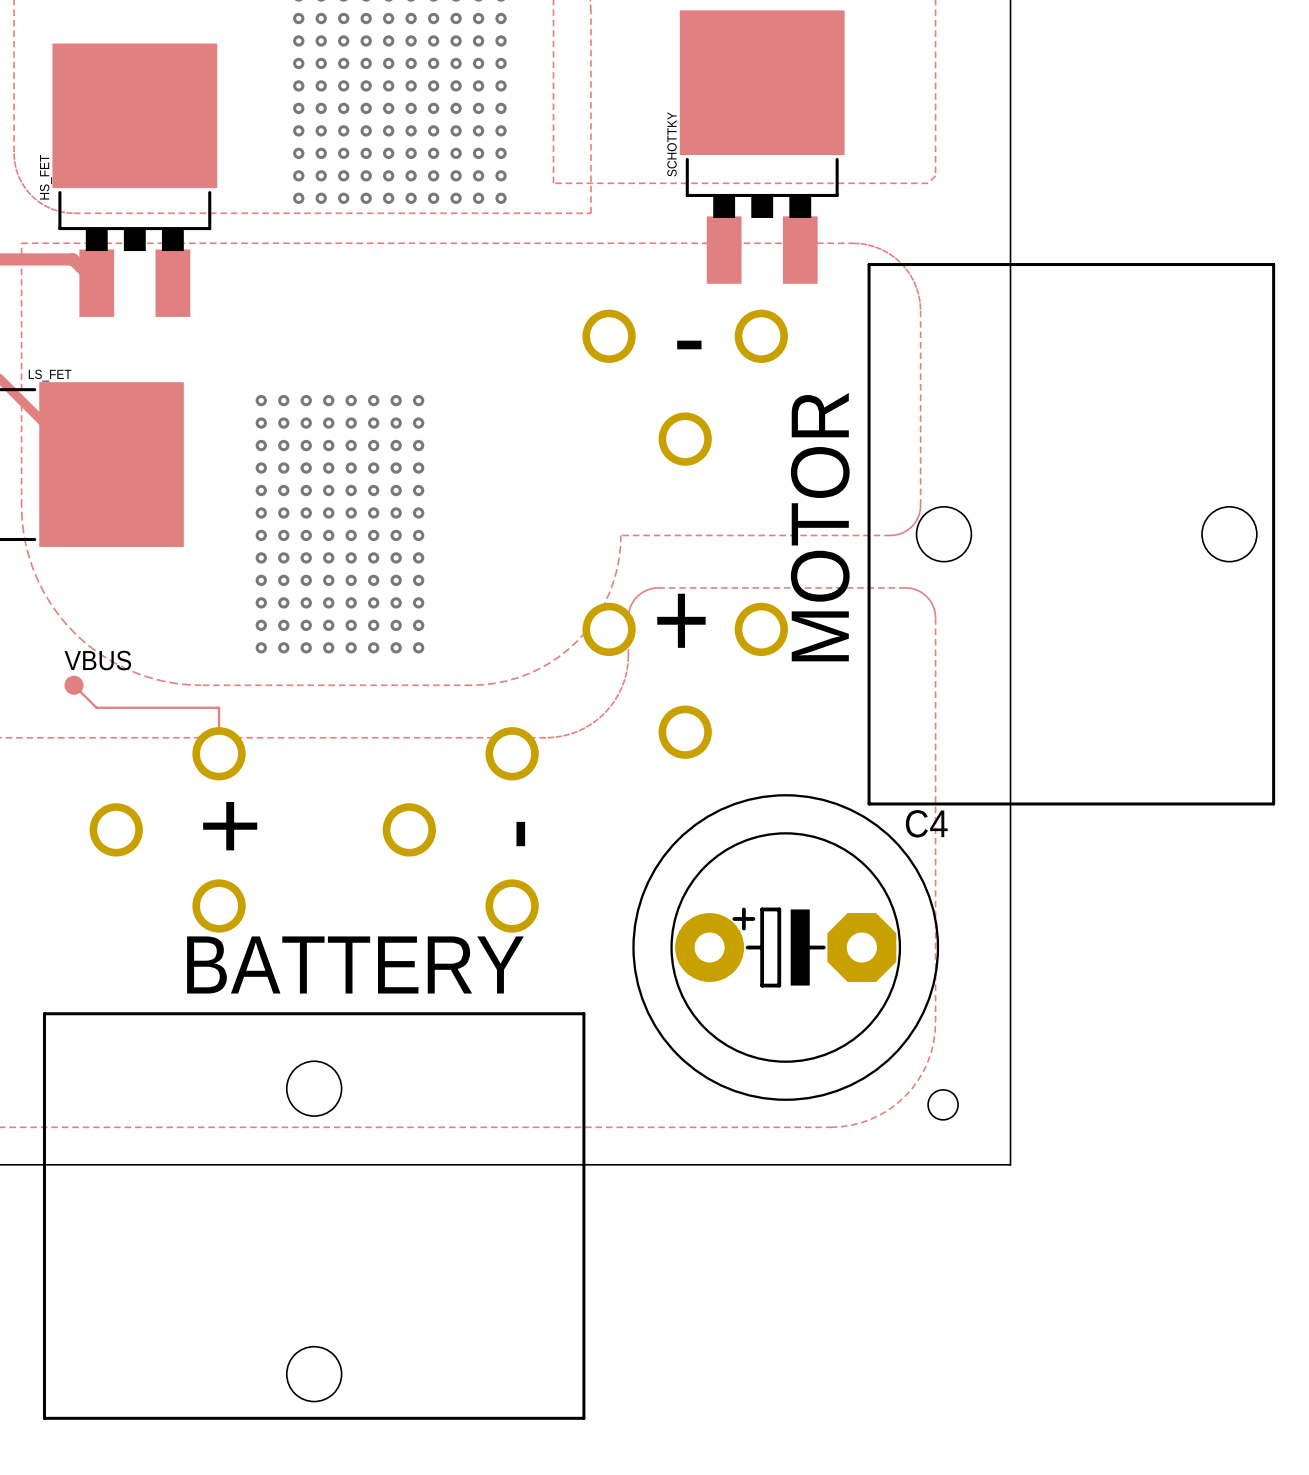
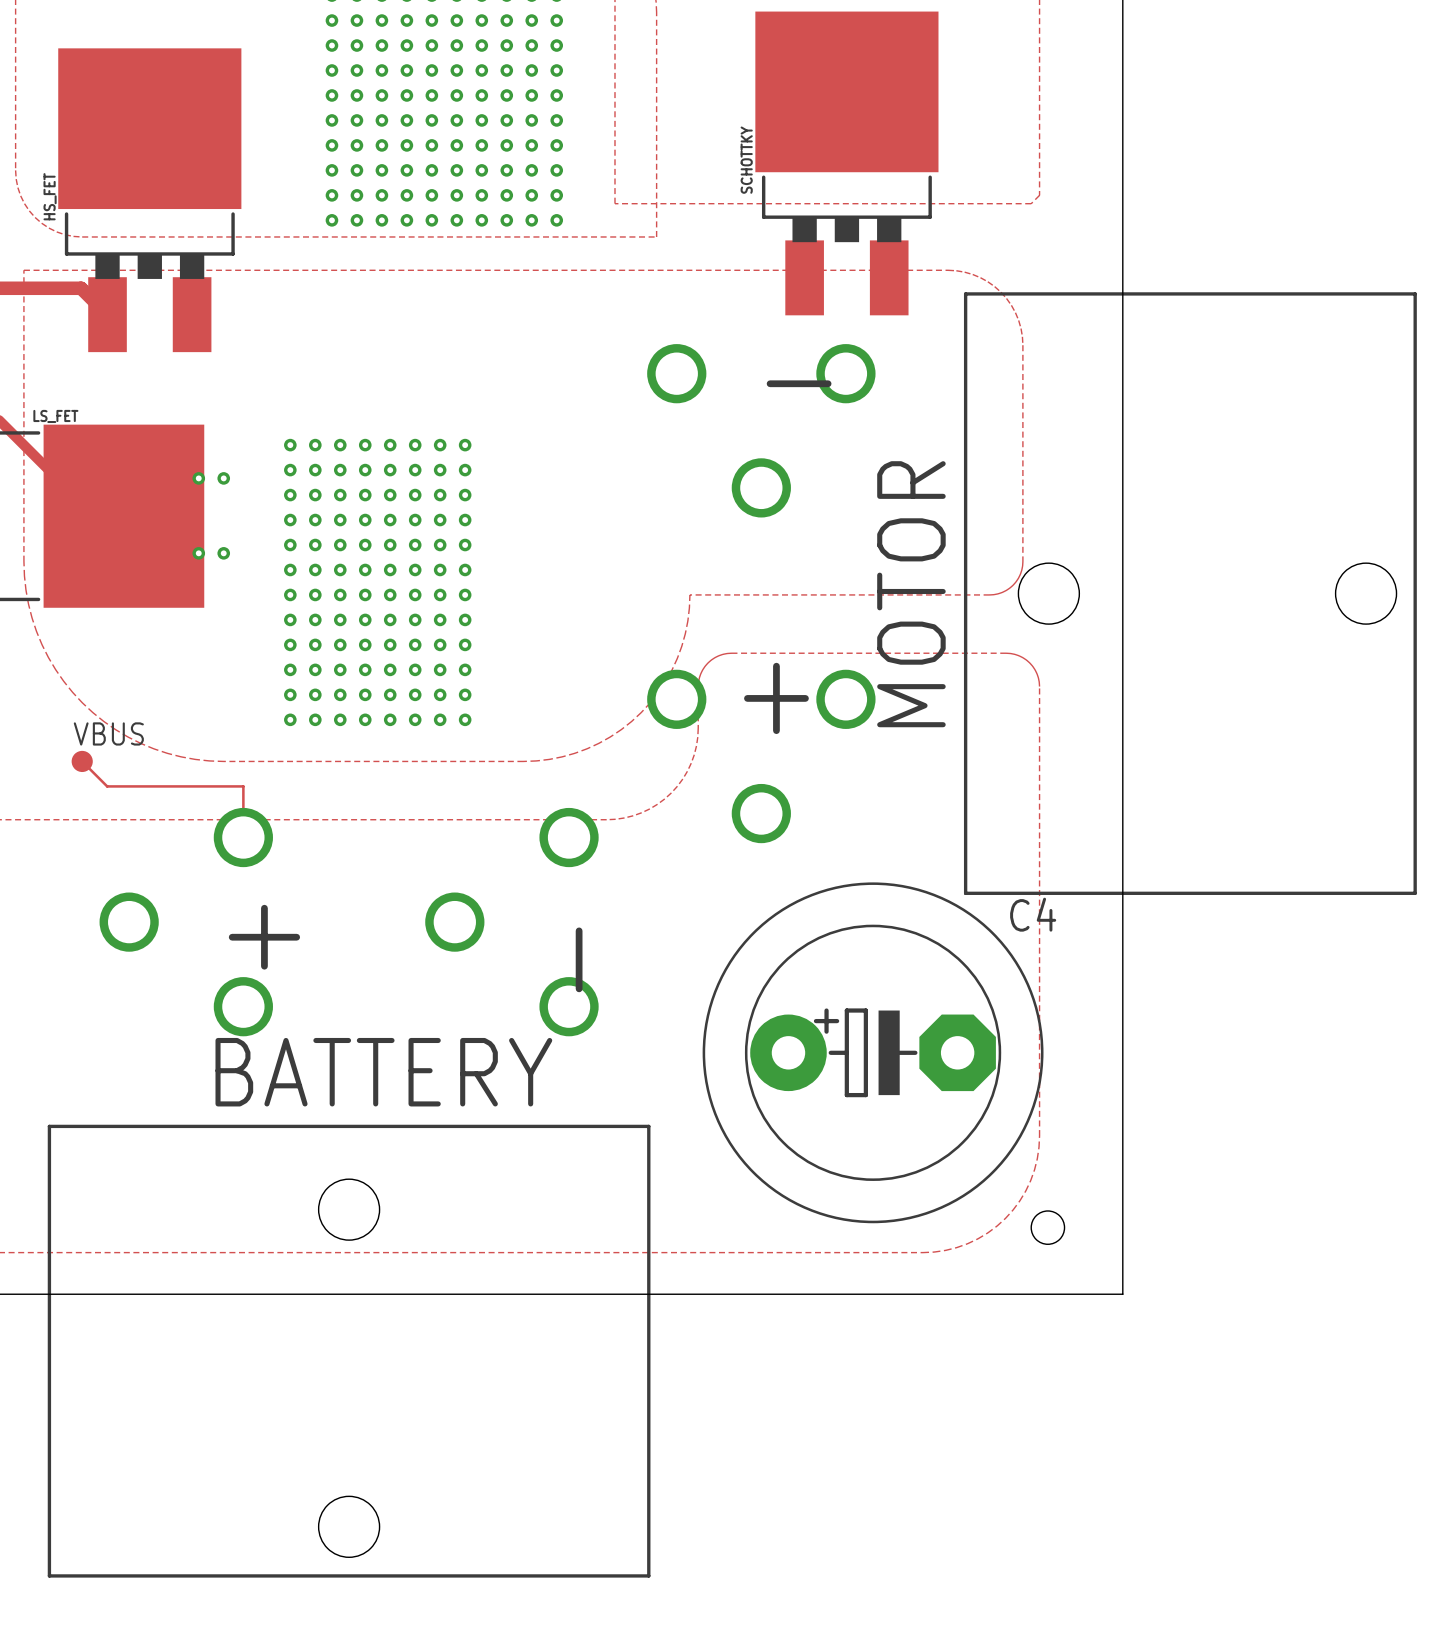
via: none -> (198, 478)
via: none -> (223, 478)
via: none -> (198, 553)
via: none -> (223, 553)

